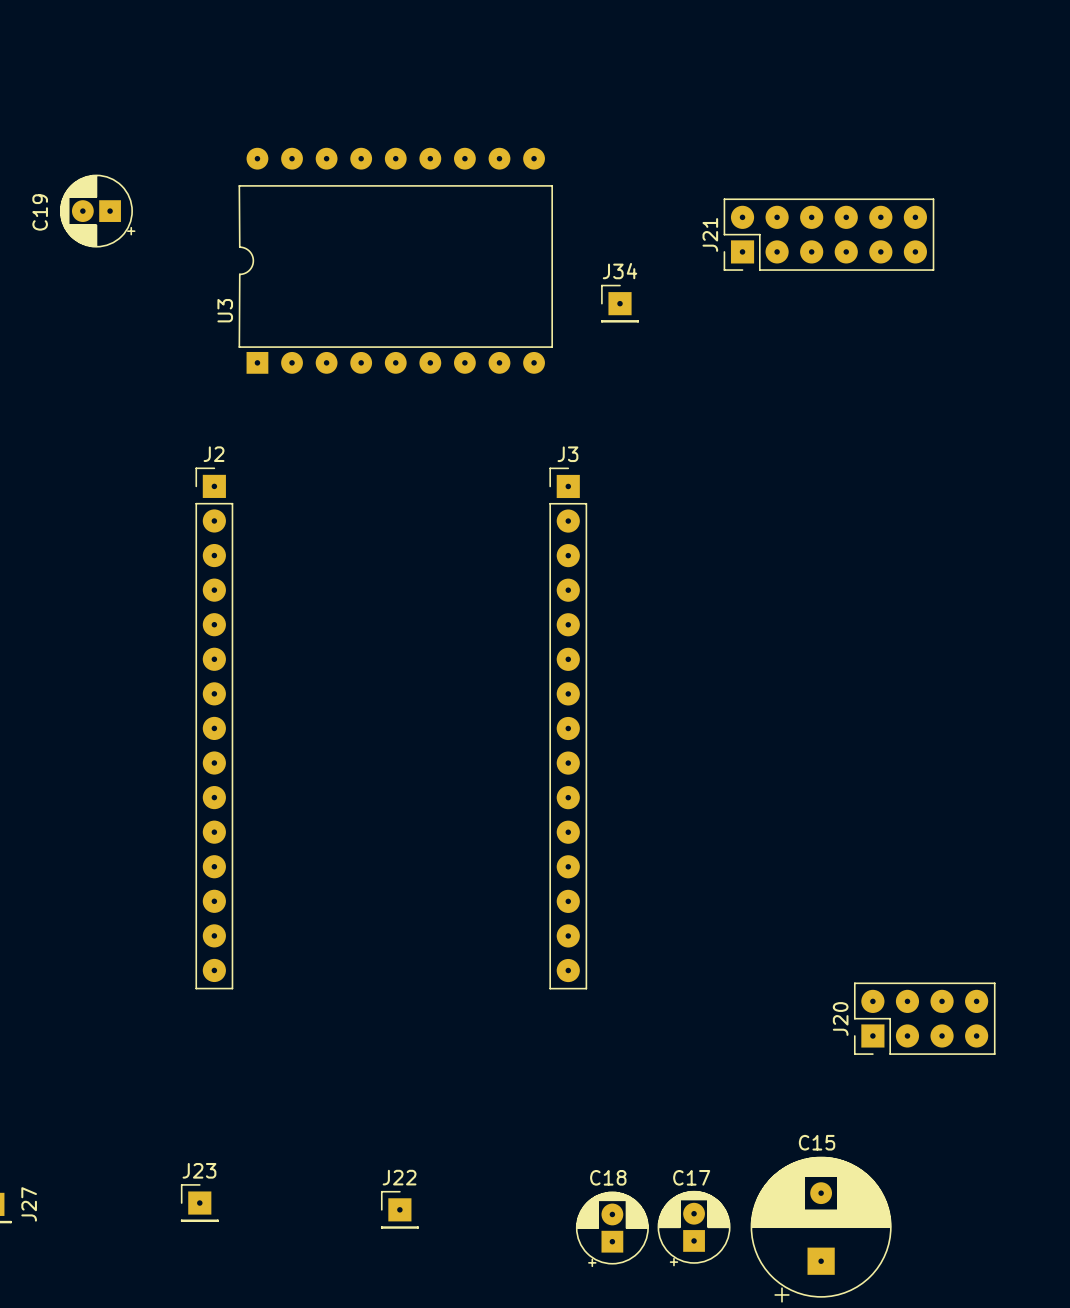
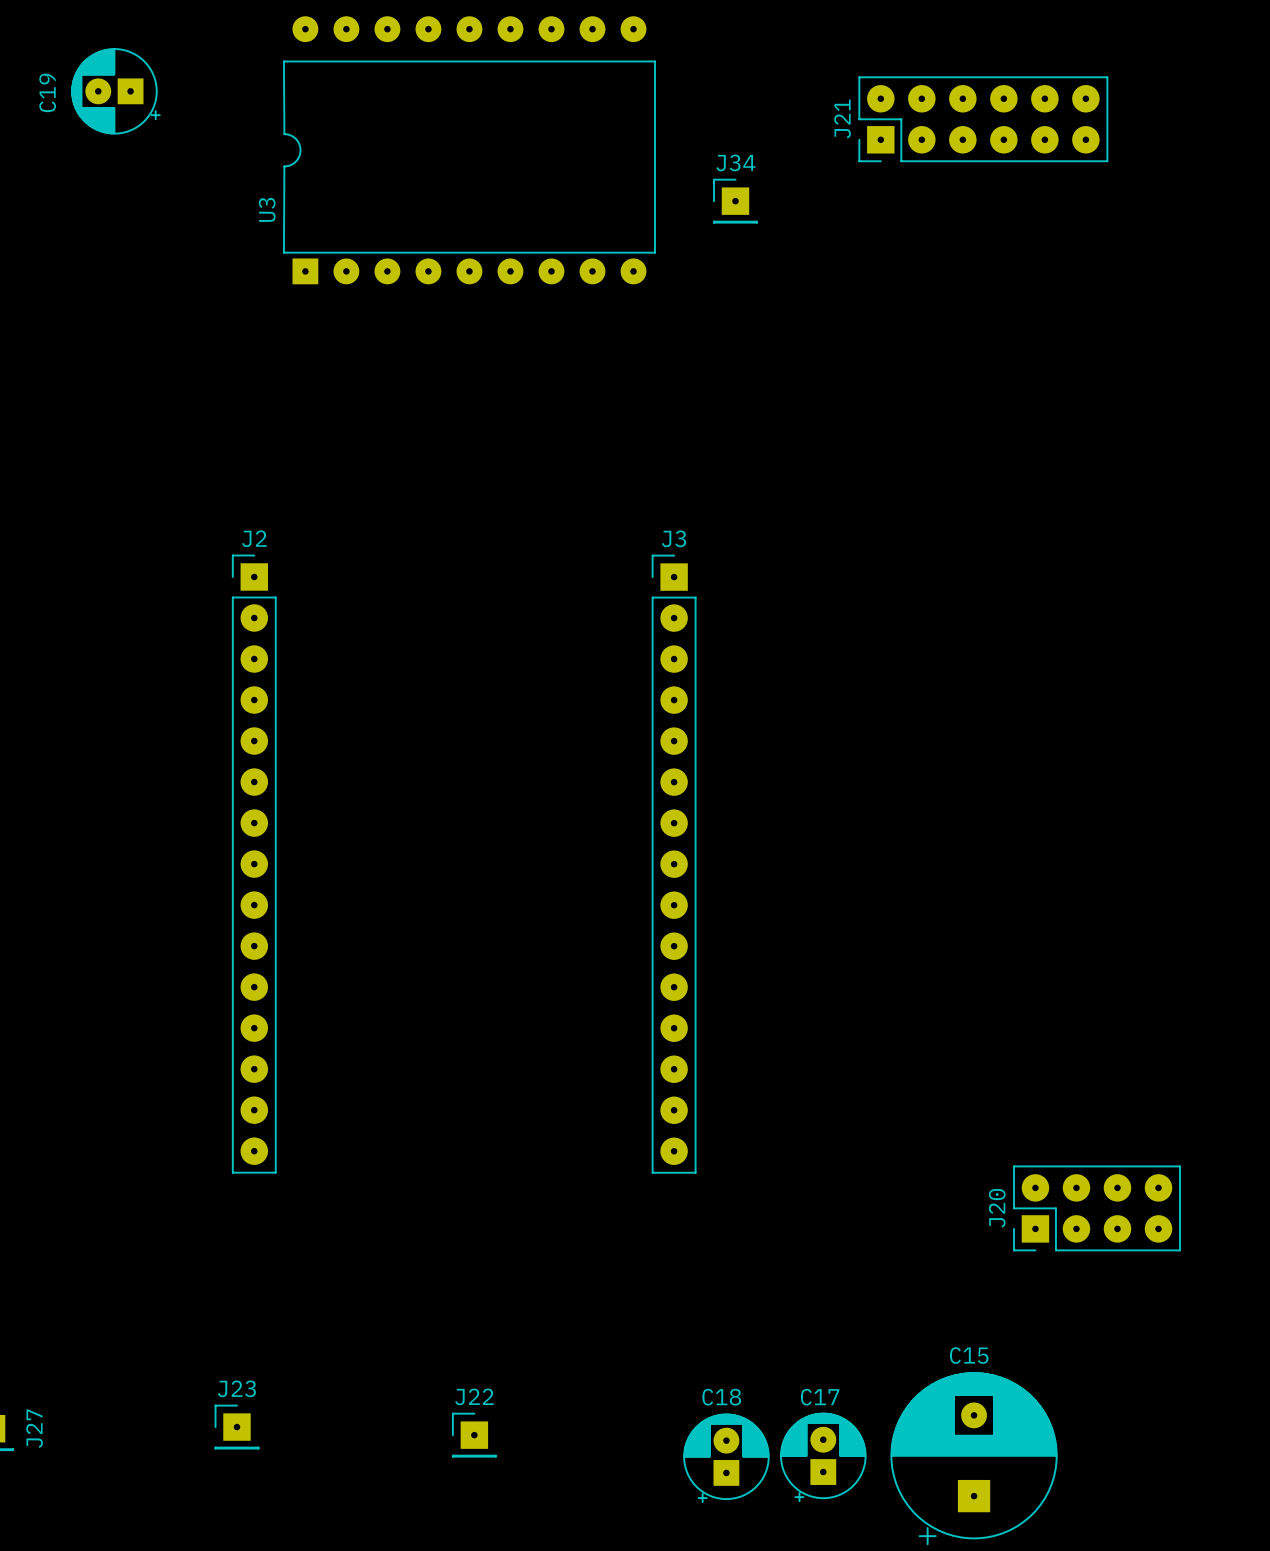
C19 position: (97, 211) -> (115, 91)
J21 position: (828, 234) -> (983, 119)
U3 position: (395, 260) -> (469, 150)
J34 position: (620, 303) -> (735, 201)

